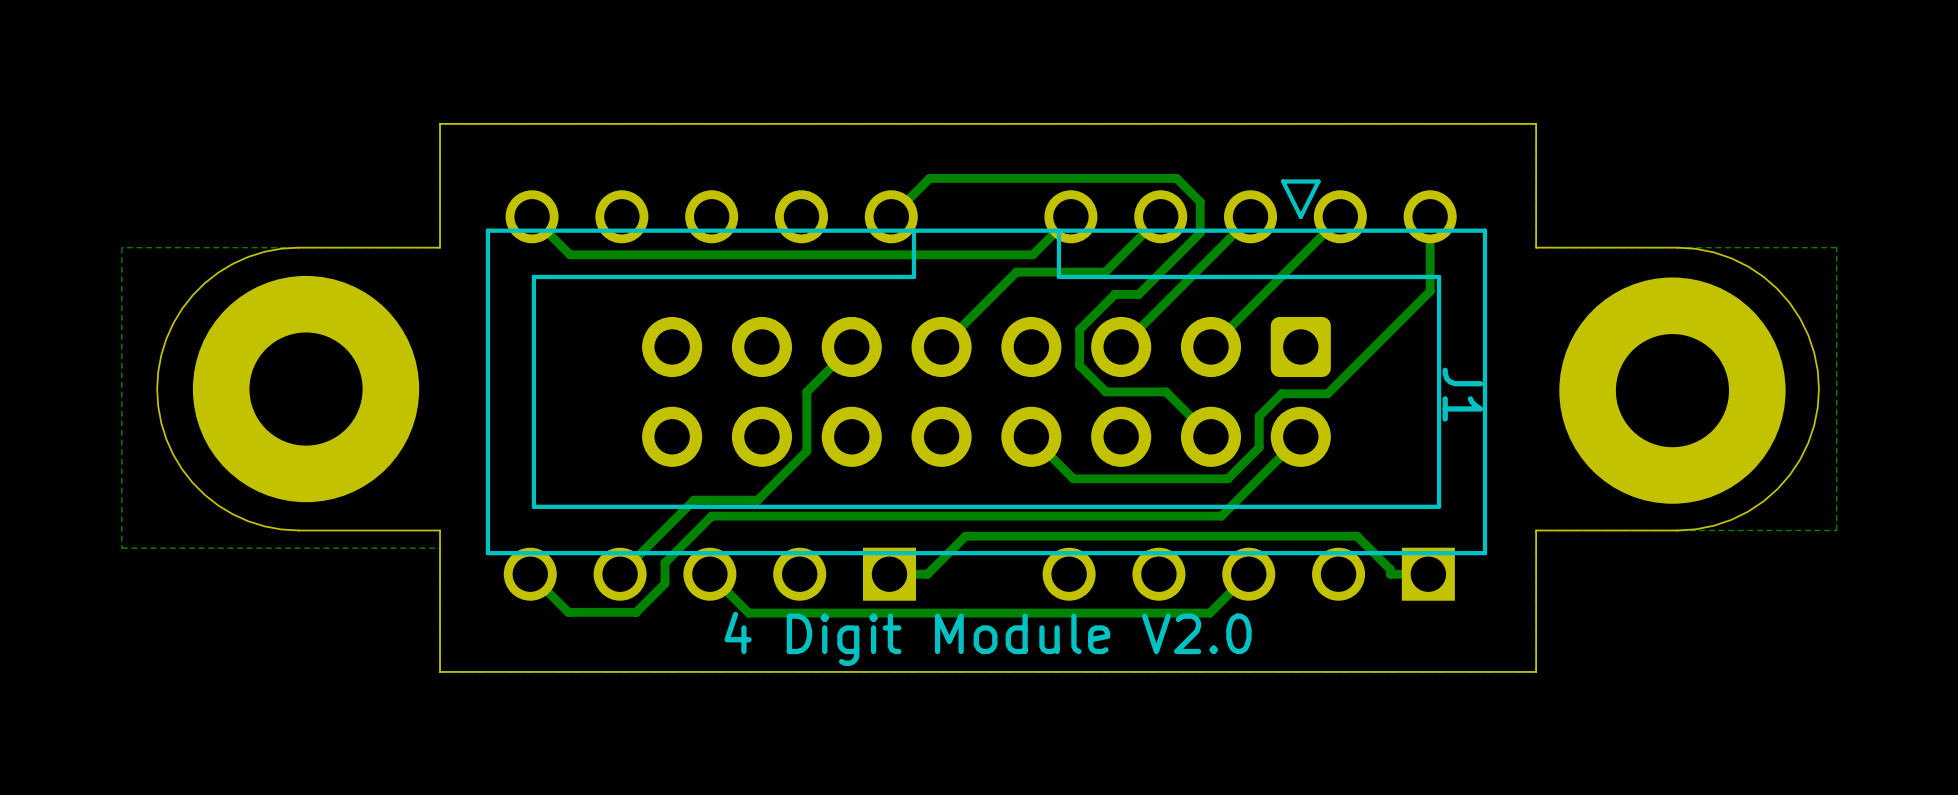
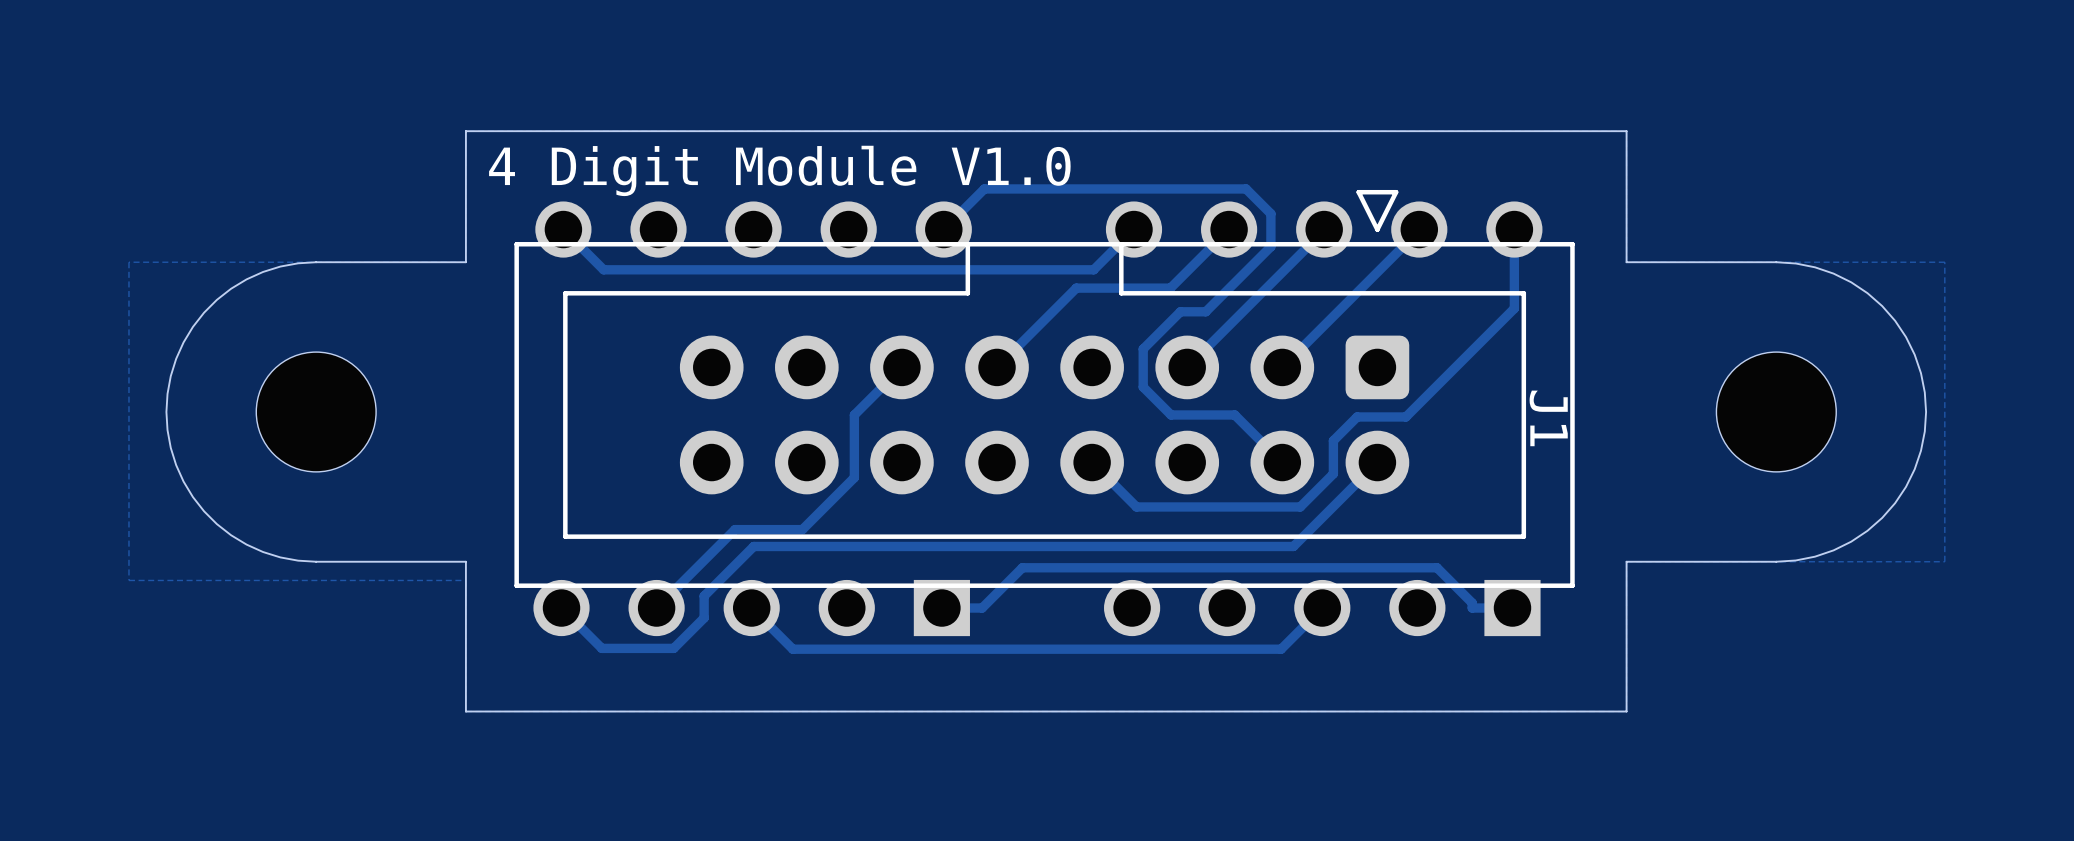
text: none -> 4 Digit Module V1.0 (779, 170)
part footprint: [192, 275, 420, 503] -> [256, 352, 377, 472]
part footprint: [1559, 277, 1786, 504] -> [1716, 352, 1837, 472]
text: 4 Digit Module V2.0 (988, 638) -> none

